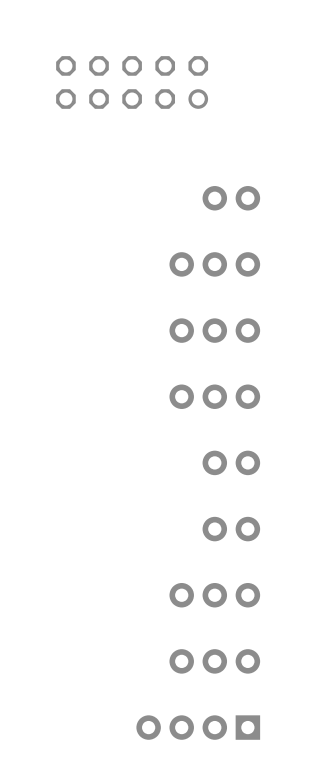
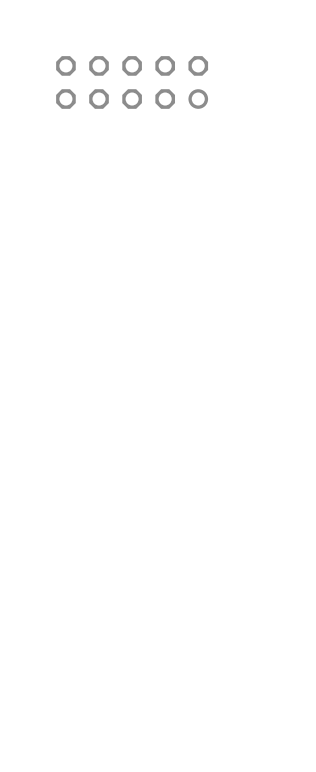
part: (231, 198) -> none
part: (214, 264) -> none
part: (214, 330) -> none
part: (214, 396) -> none
part: (231, 462) -> none
part: (231, 529) -> none
part: (214, 595) -> none
part: (214, 661) -> none
part: (198, 727) -> none

